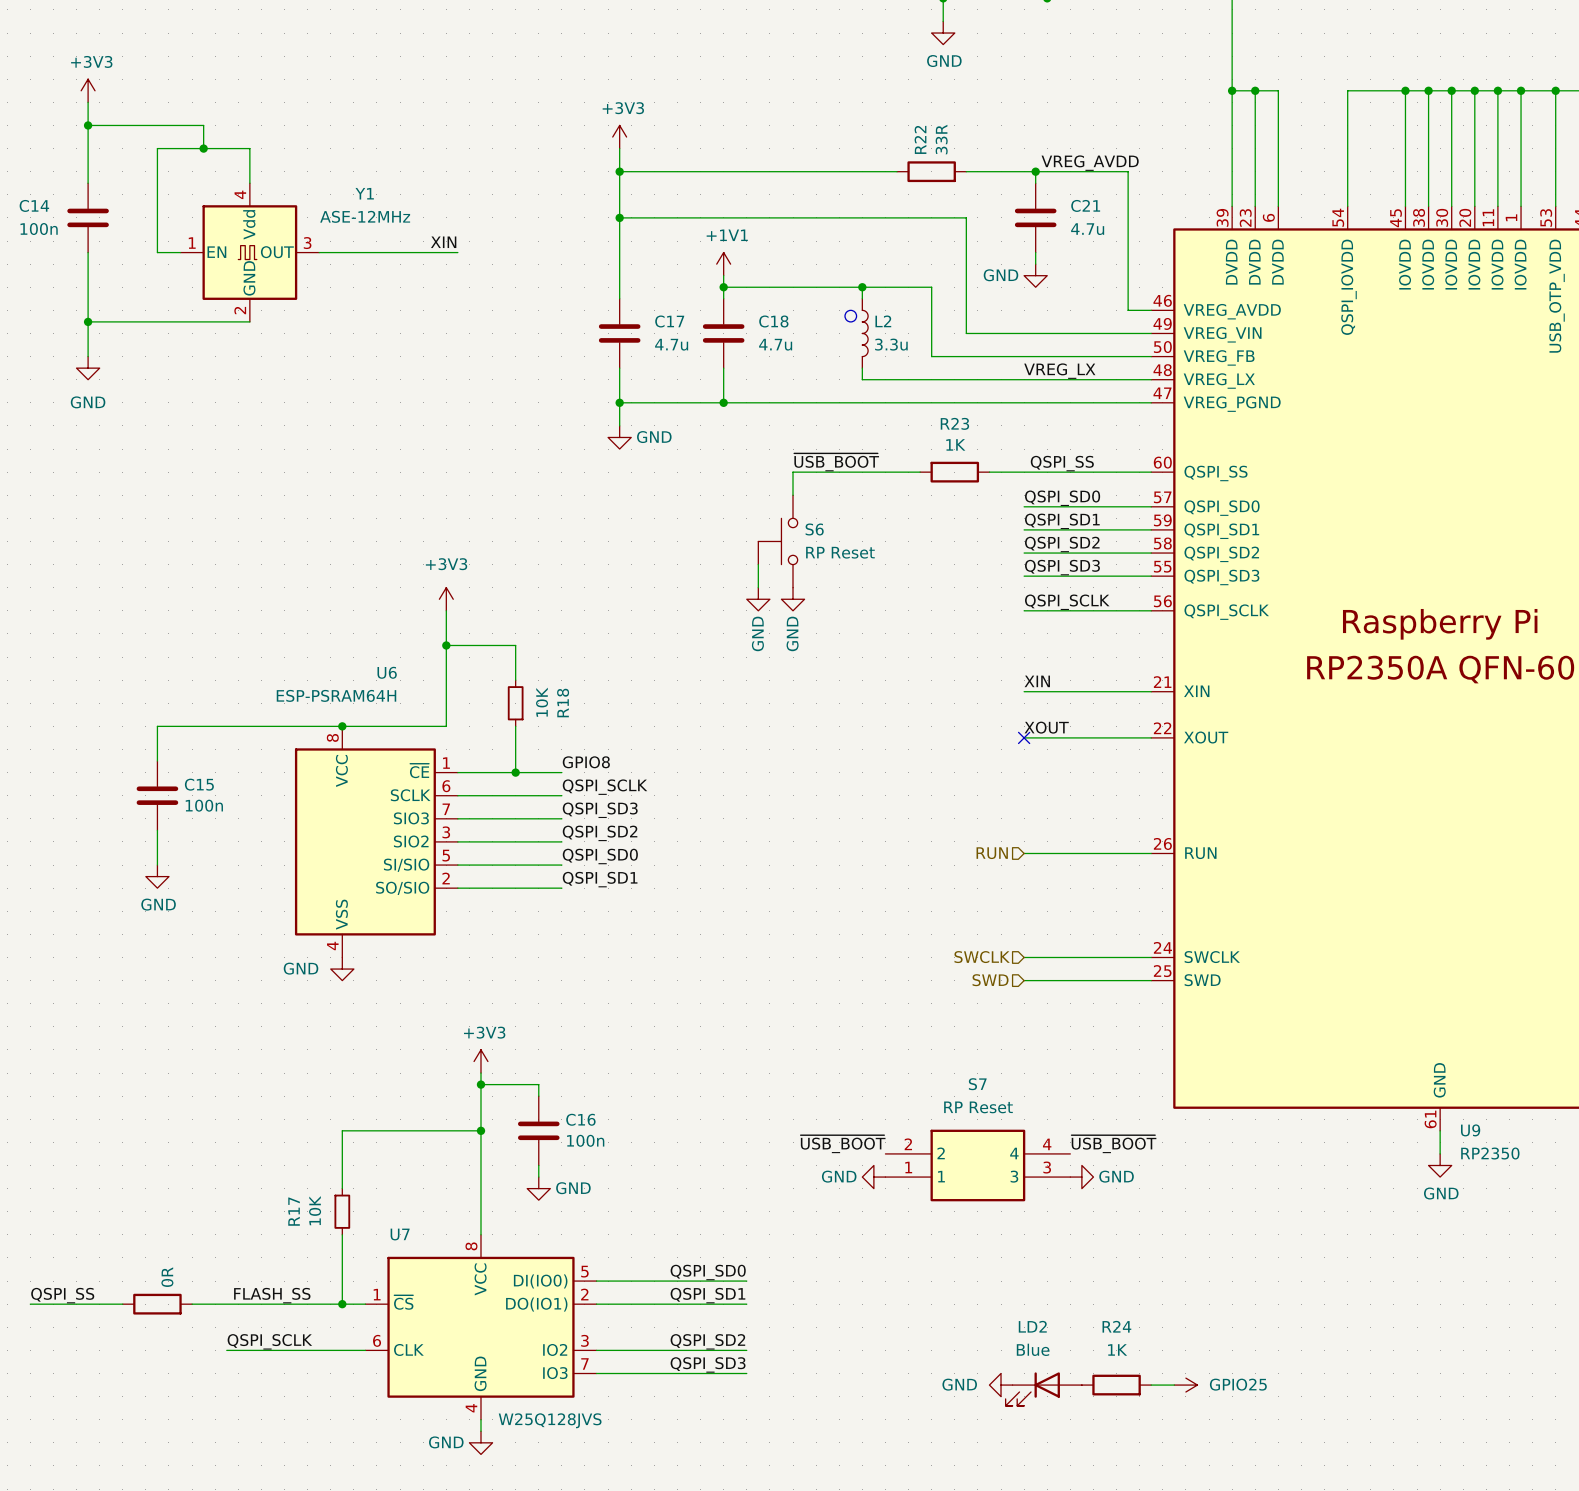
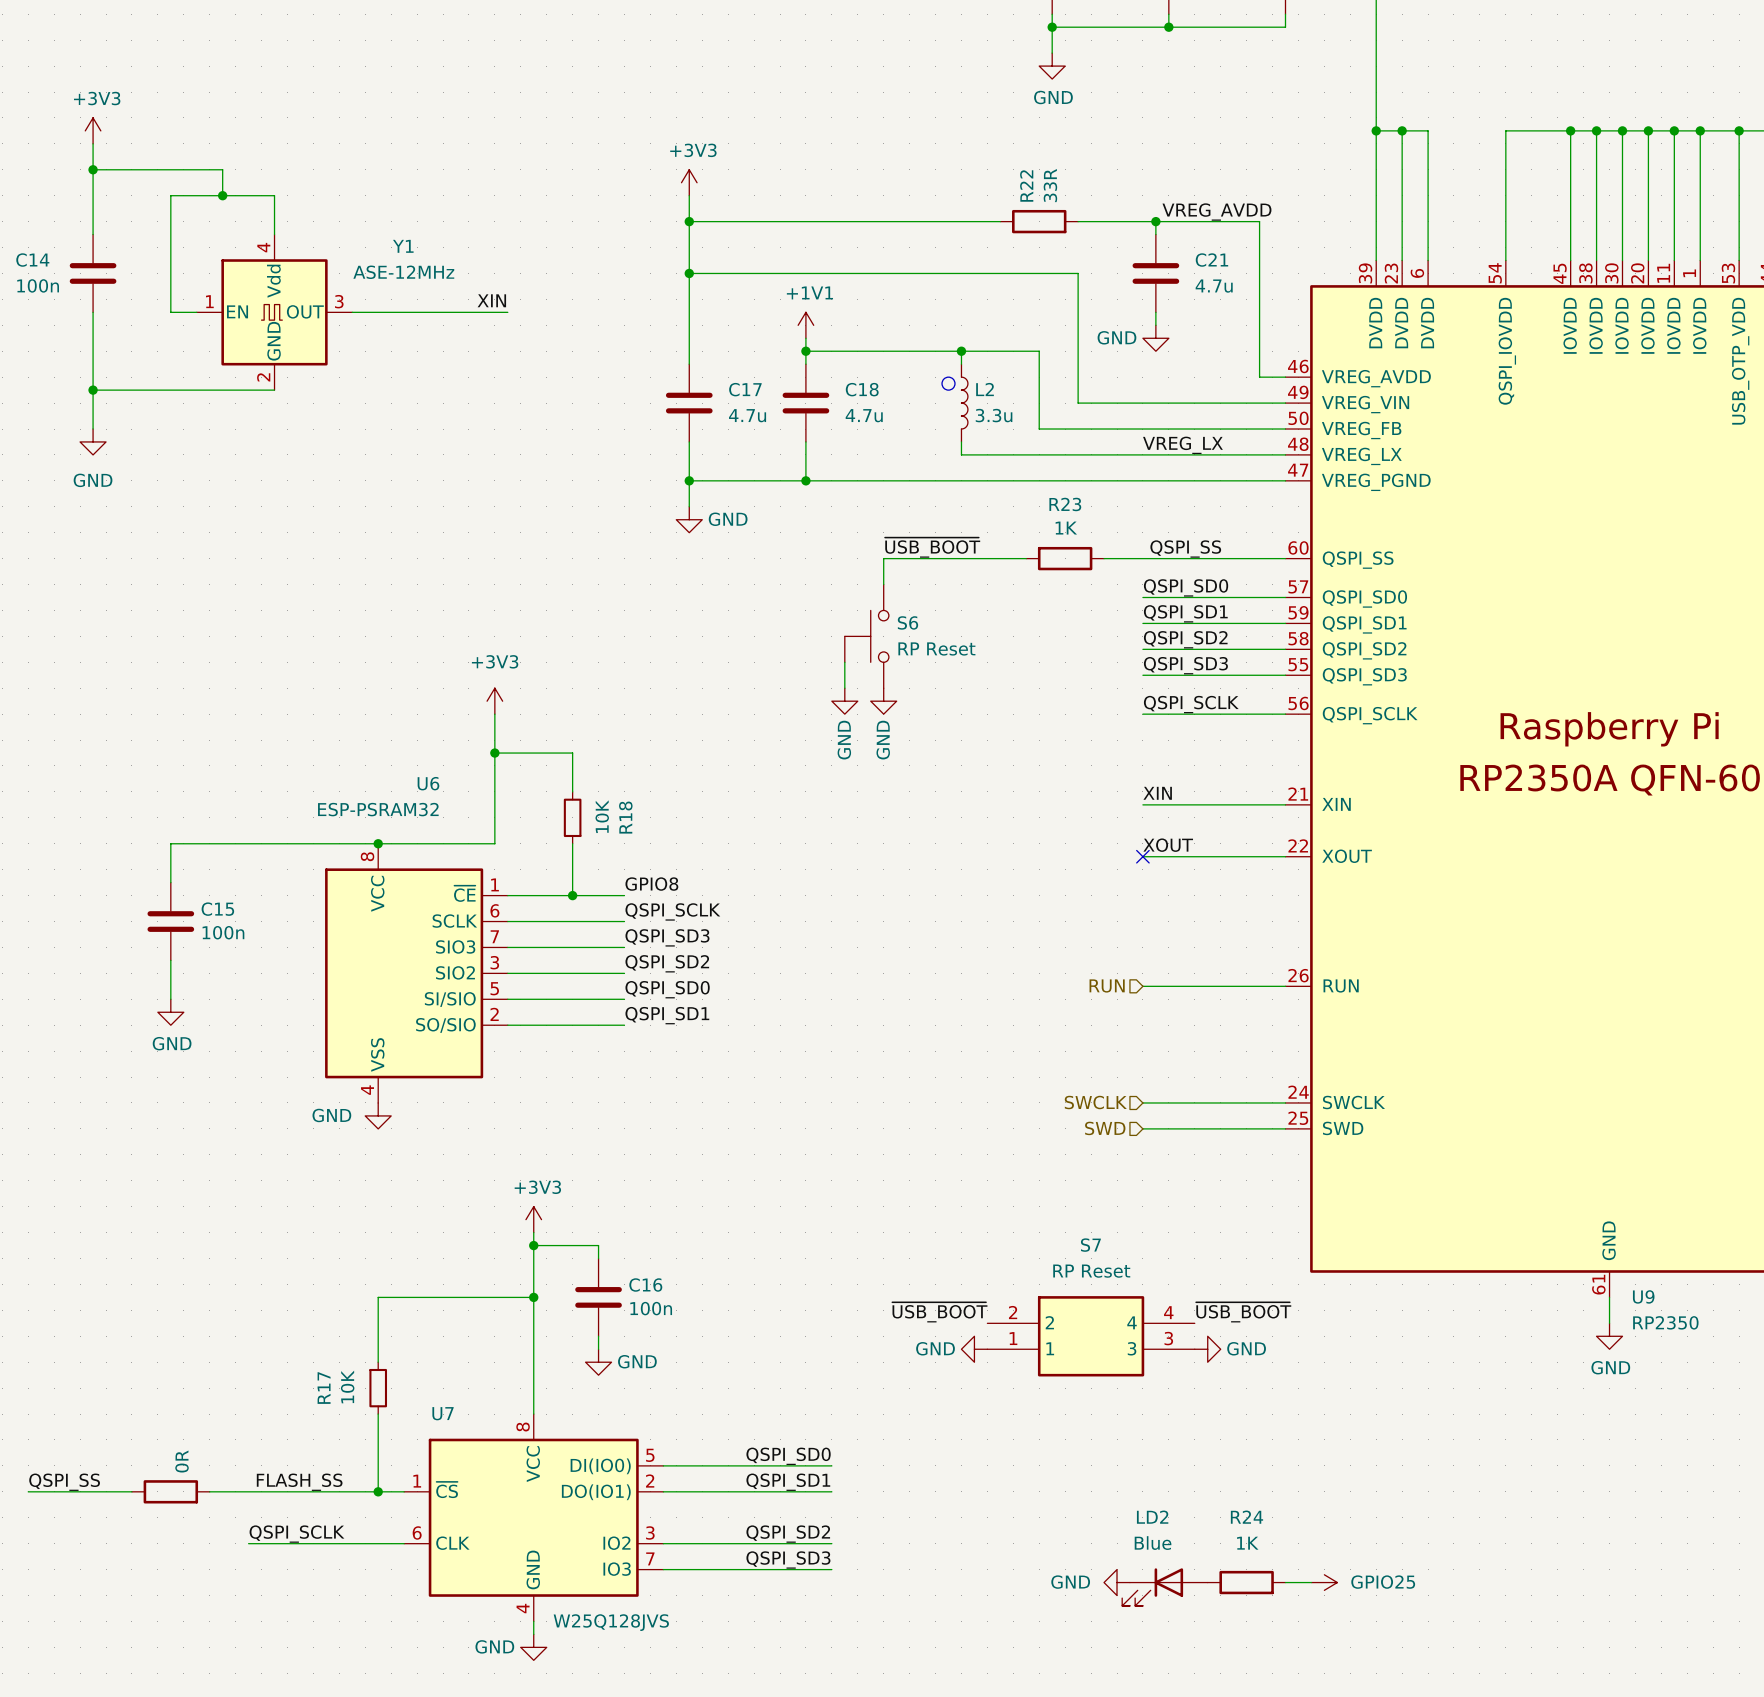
U6 value: ESP-PSRAM64H (336, 695) -> ESP-PSRAM32 (378, 809)

